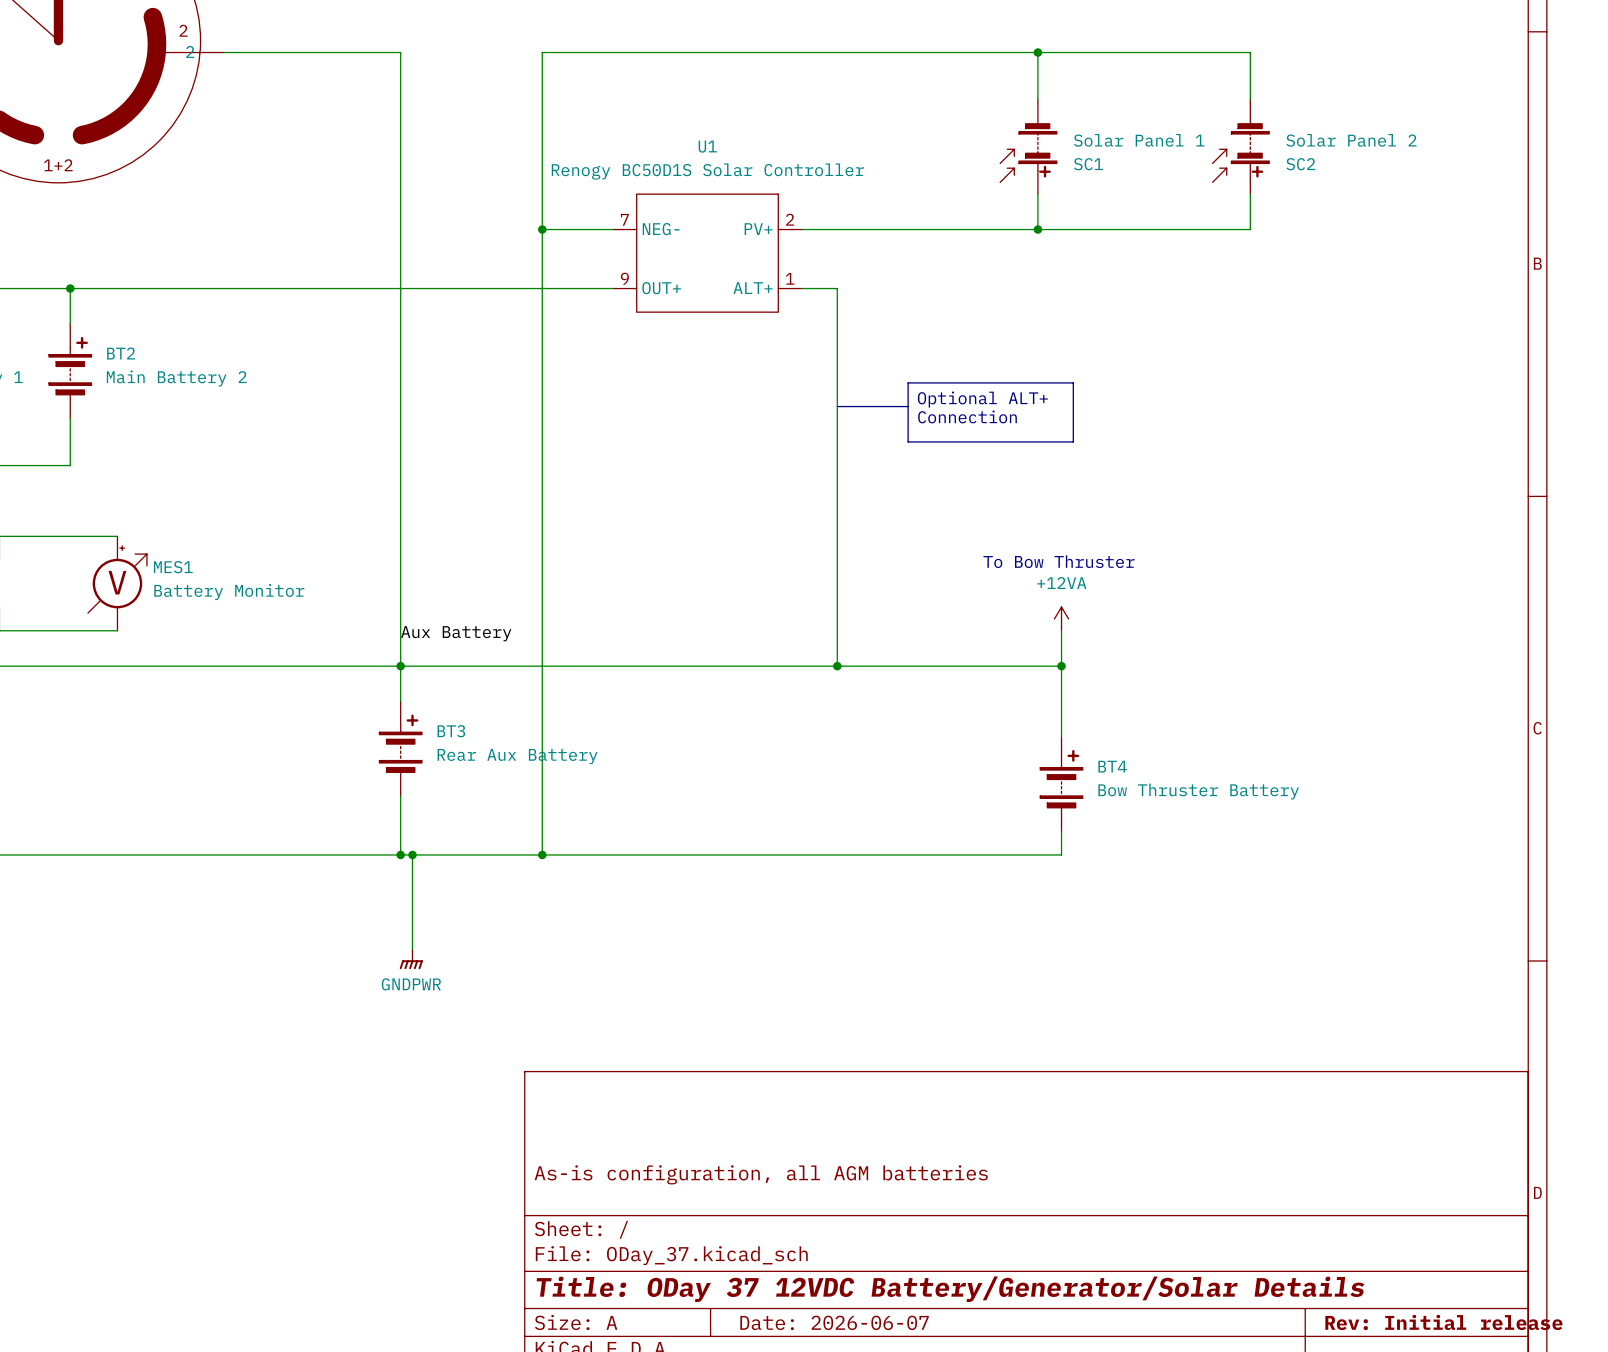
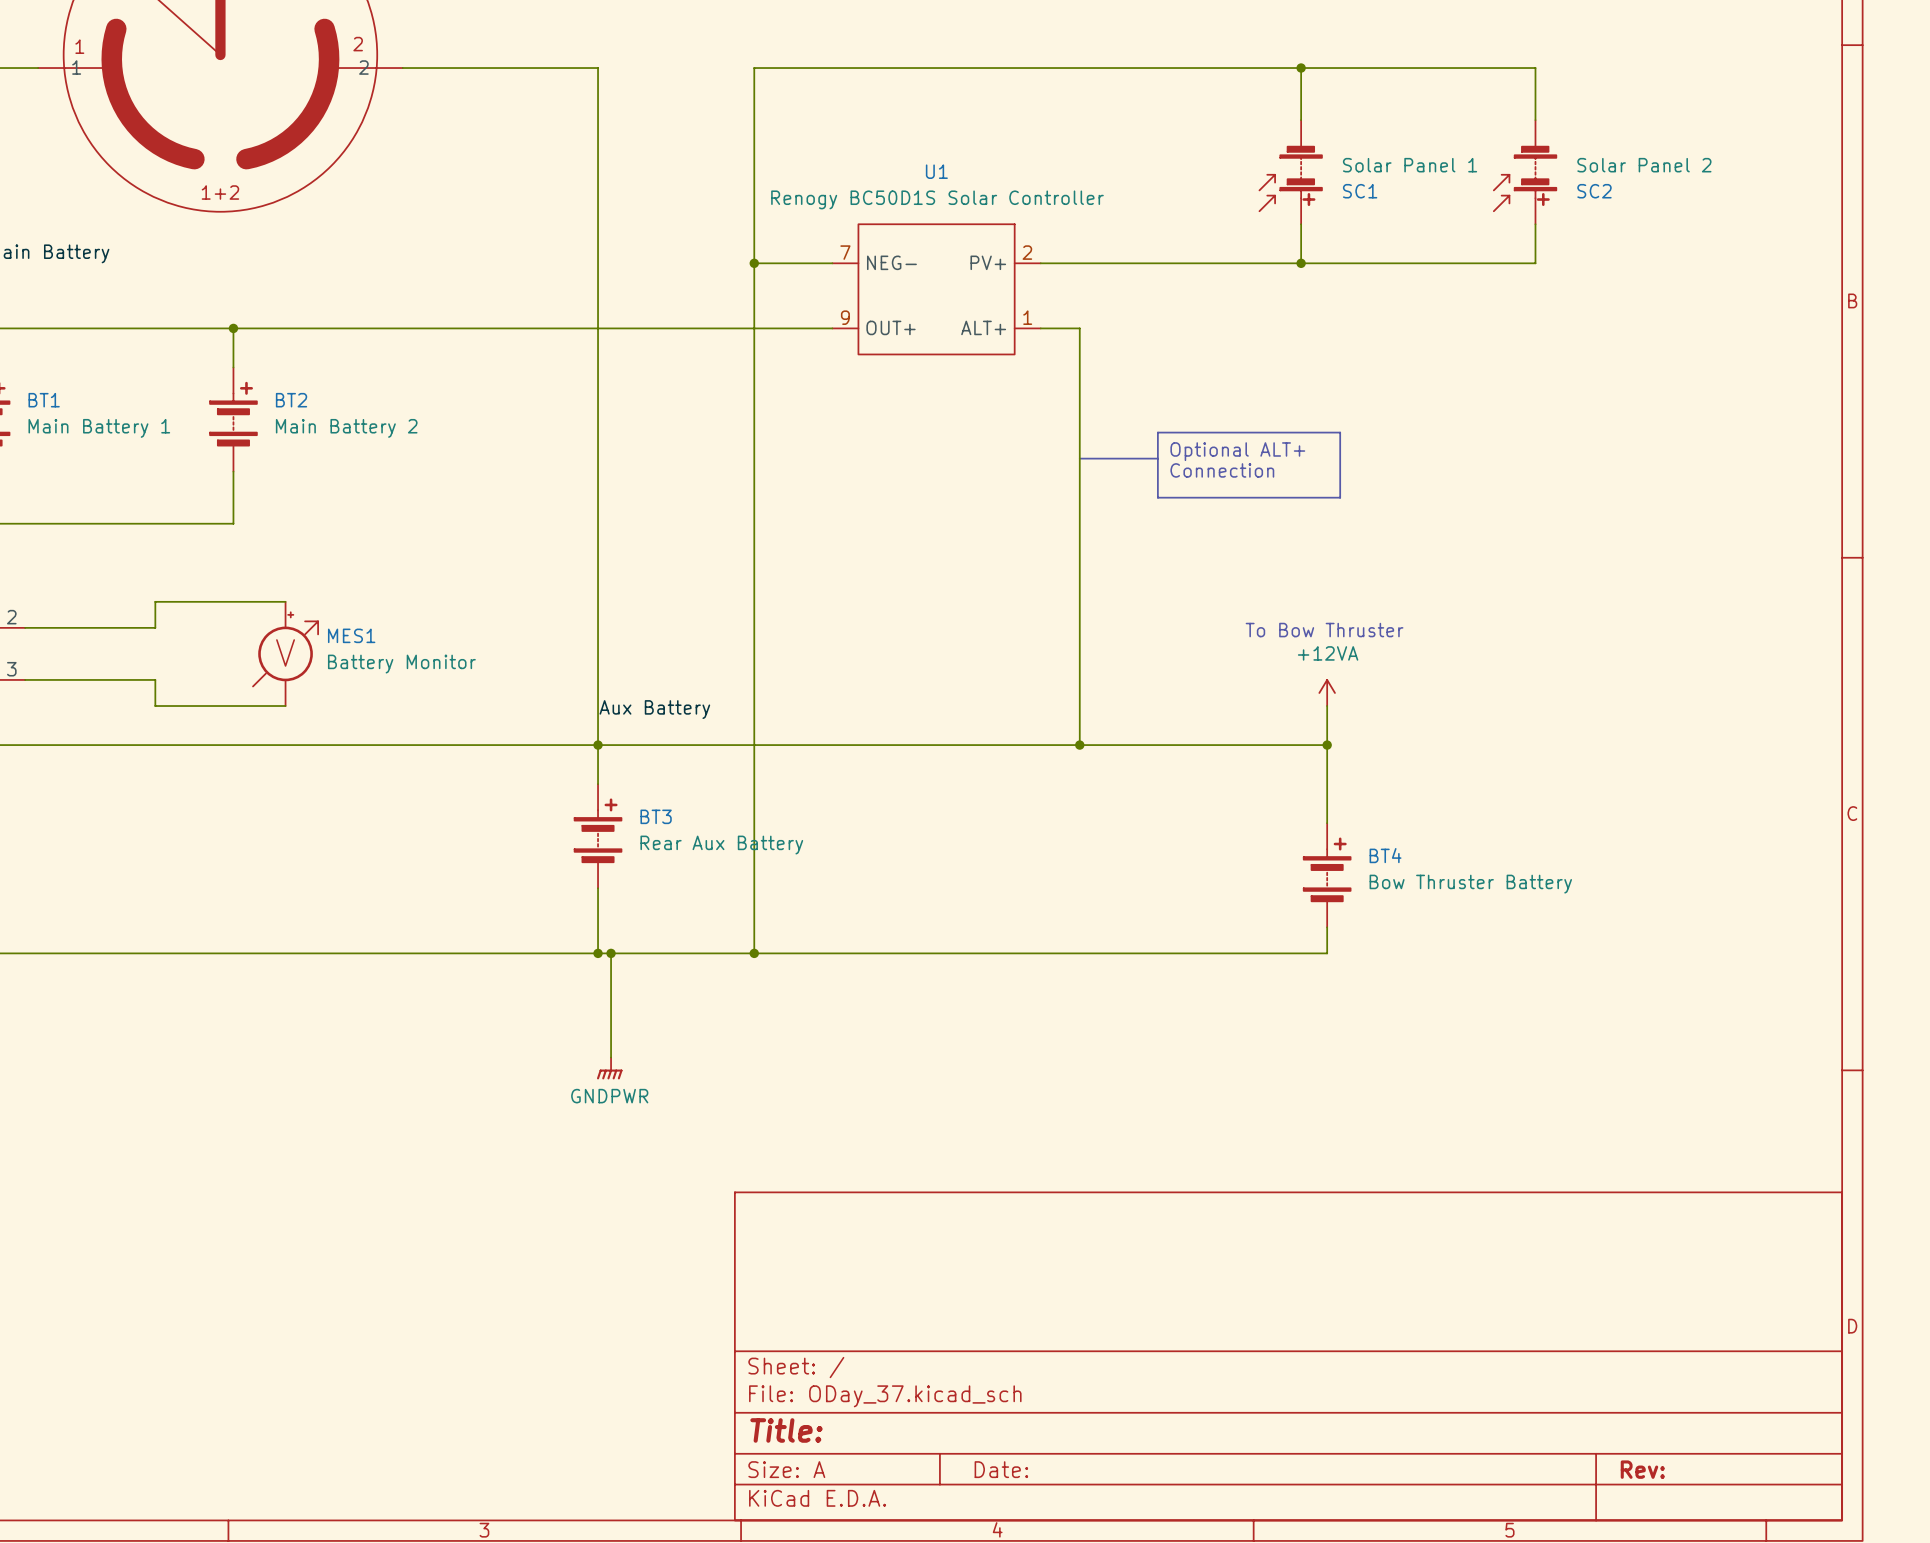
title block: As-is configuration, all AGM batteries (761, 1174) -> none
title block: Title: ODay 37 12VDC Battery/Generator/Solar Details (950, 1289) -> Title: (786, 1430)
title block: Date: 2026-06-07 (834, 1322) -> Date: (1001, 1469)
title block: Rev: Initial release (1443, 1322) -> Rev: (1642, 1469)

